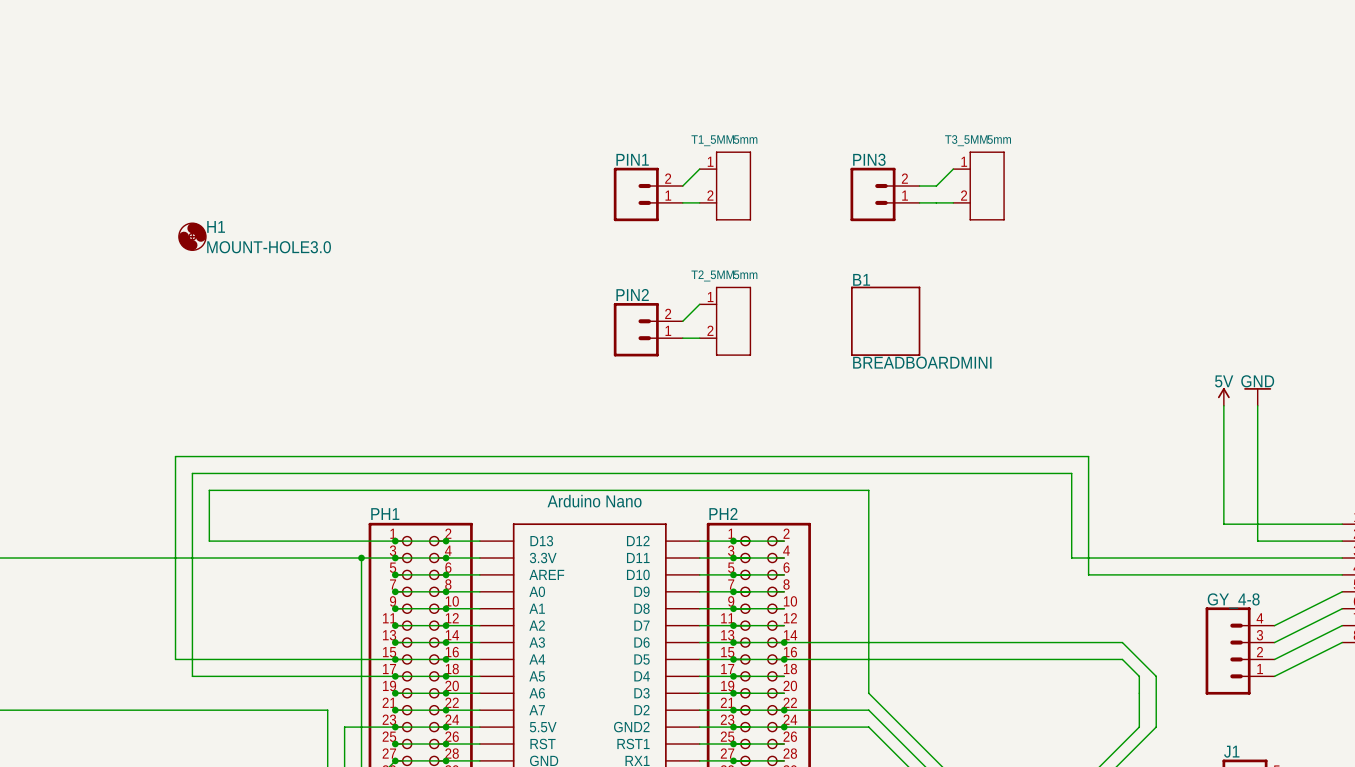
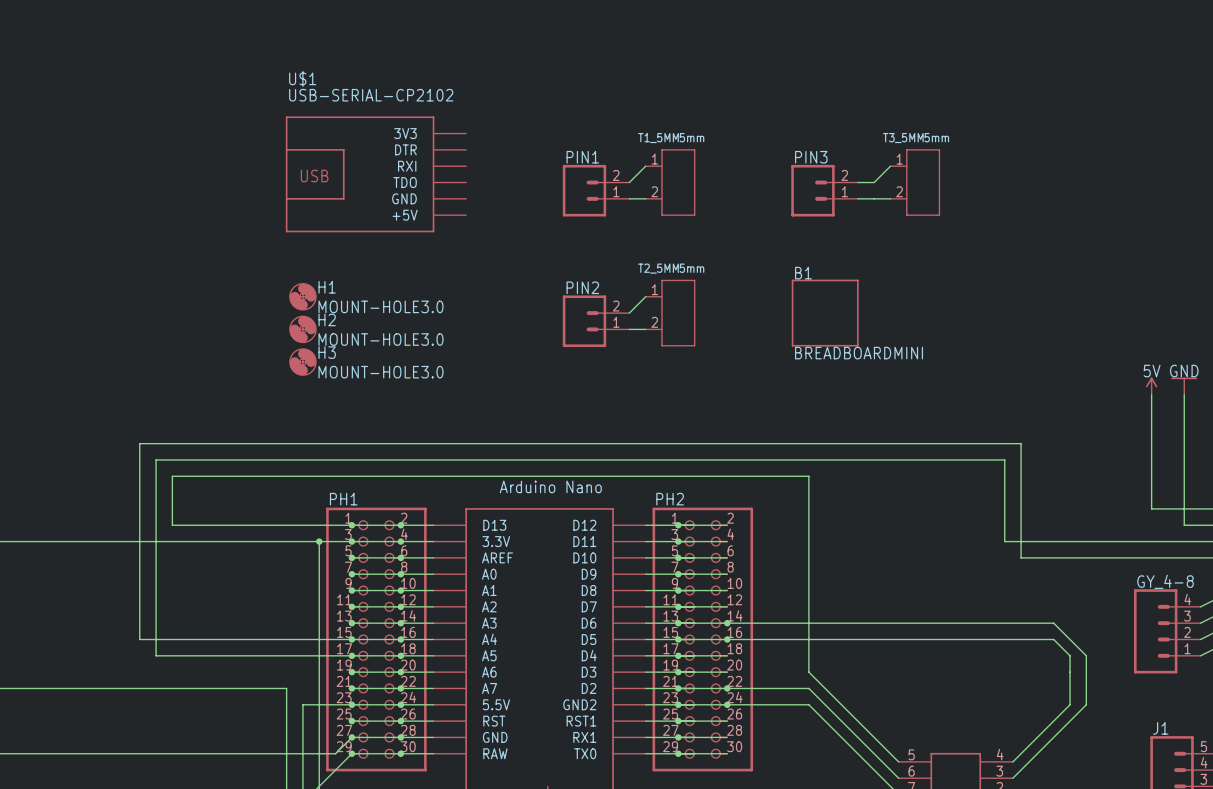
U$1: none -> USB-SERIAL-CP2102 (375, 174)
H1 position: (192, 236) -> (302, 296)
H2: none -> MOUNT-HOLE3.0 (302, 329)
H3: none -> MOUNT-HOLE3.0 (302, 362)

